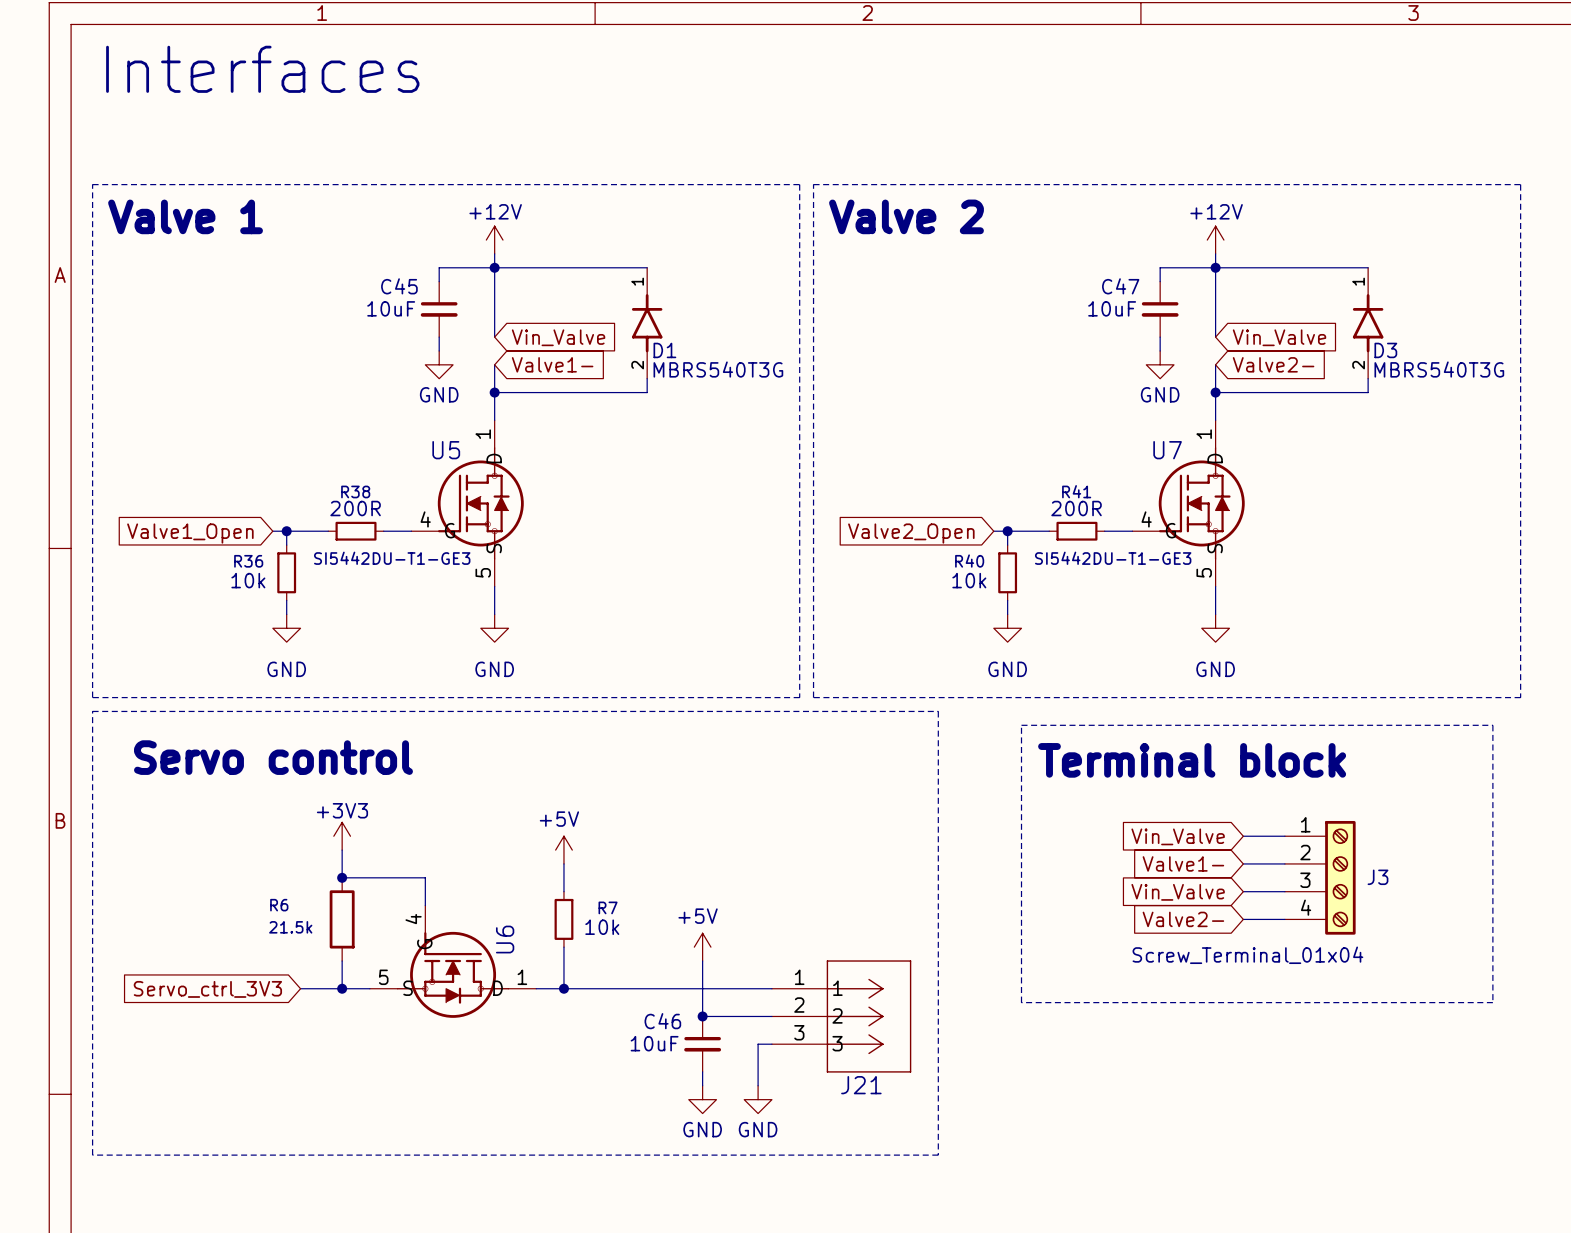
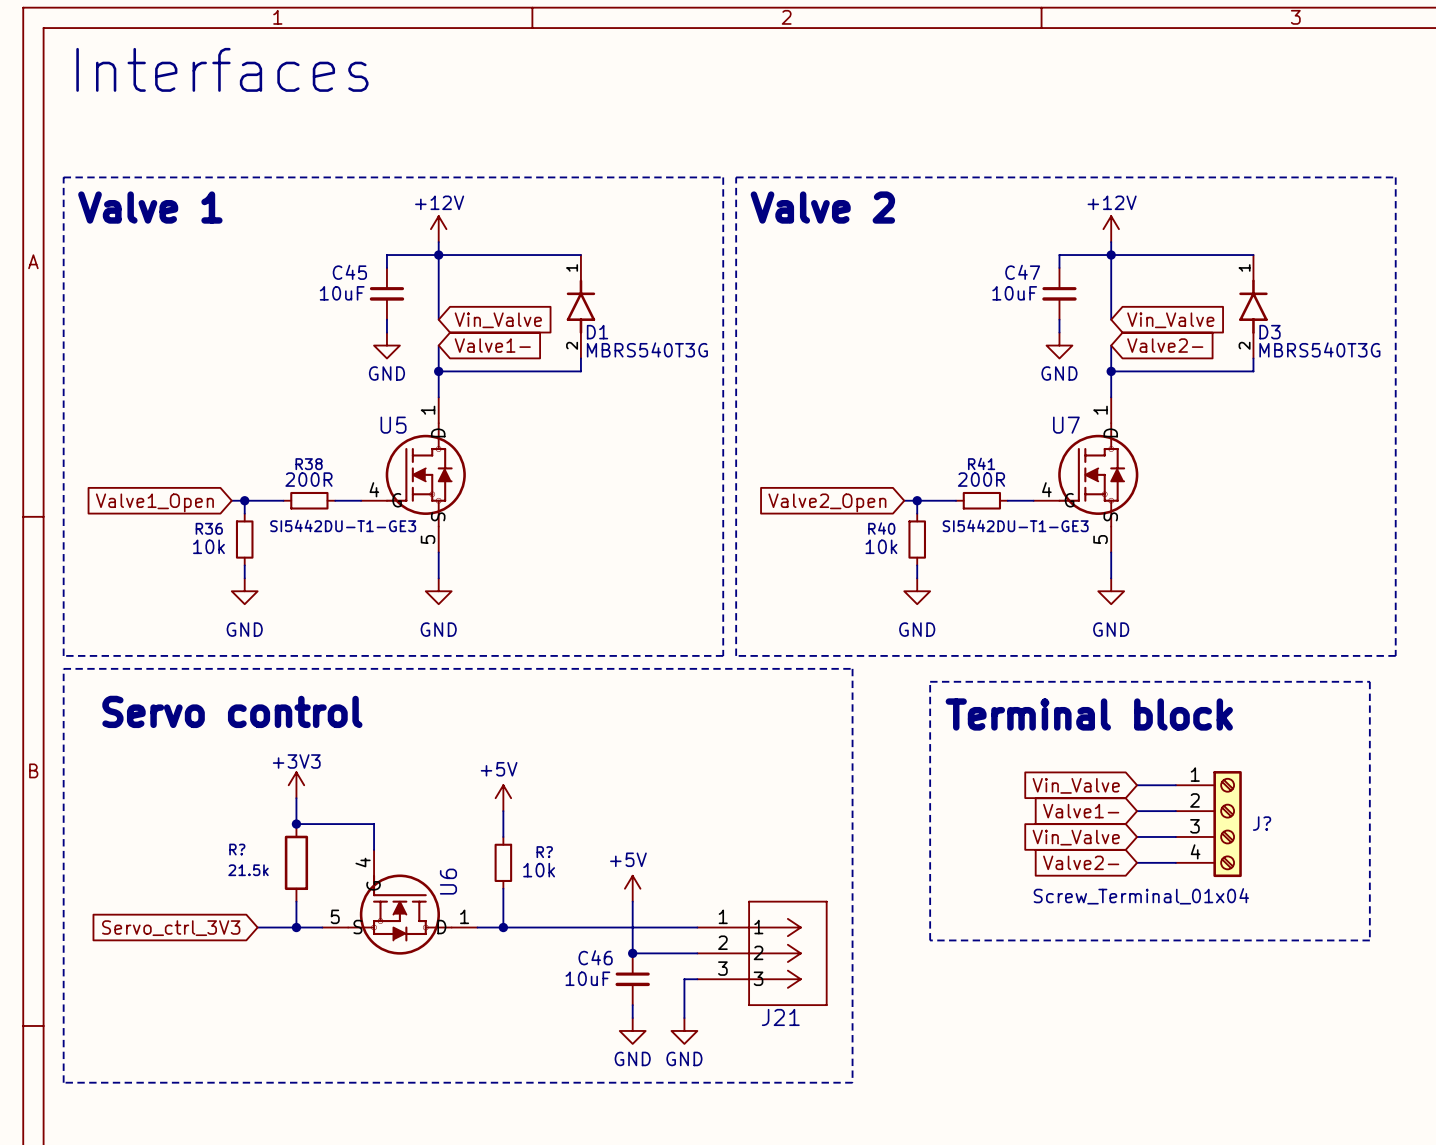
J3 name: J3 (1377, 877) -> J? (1262, 823)
R6 name: R6 (279, 905) -> R? (237, 849)
R7 name: R7 (608, 907) -> R? (544, 852)

